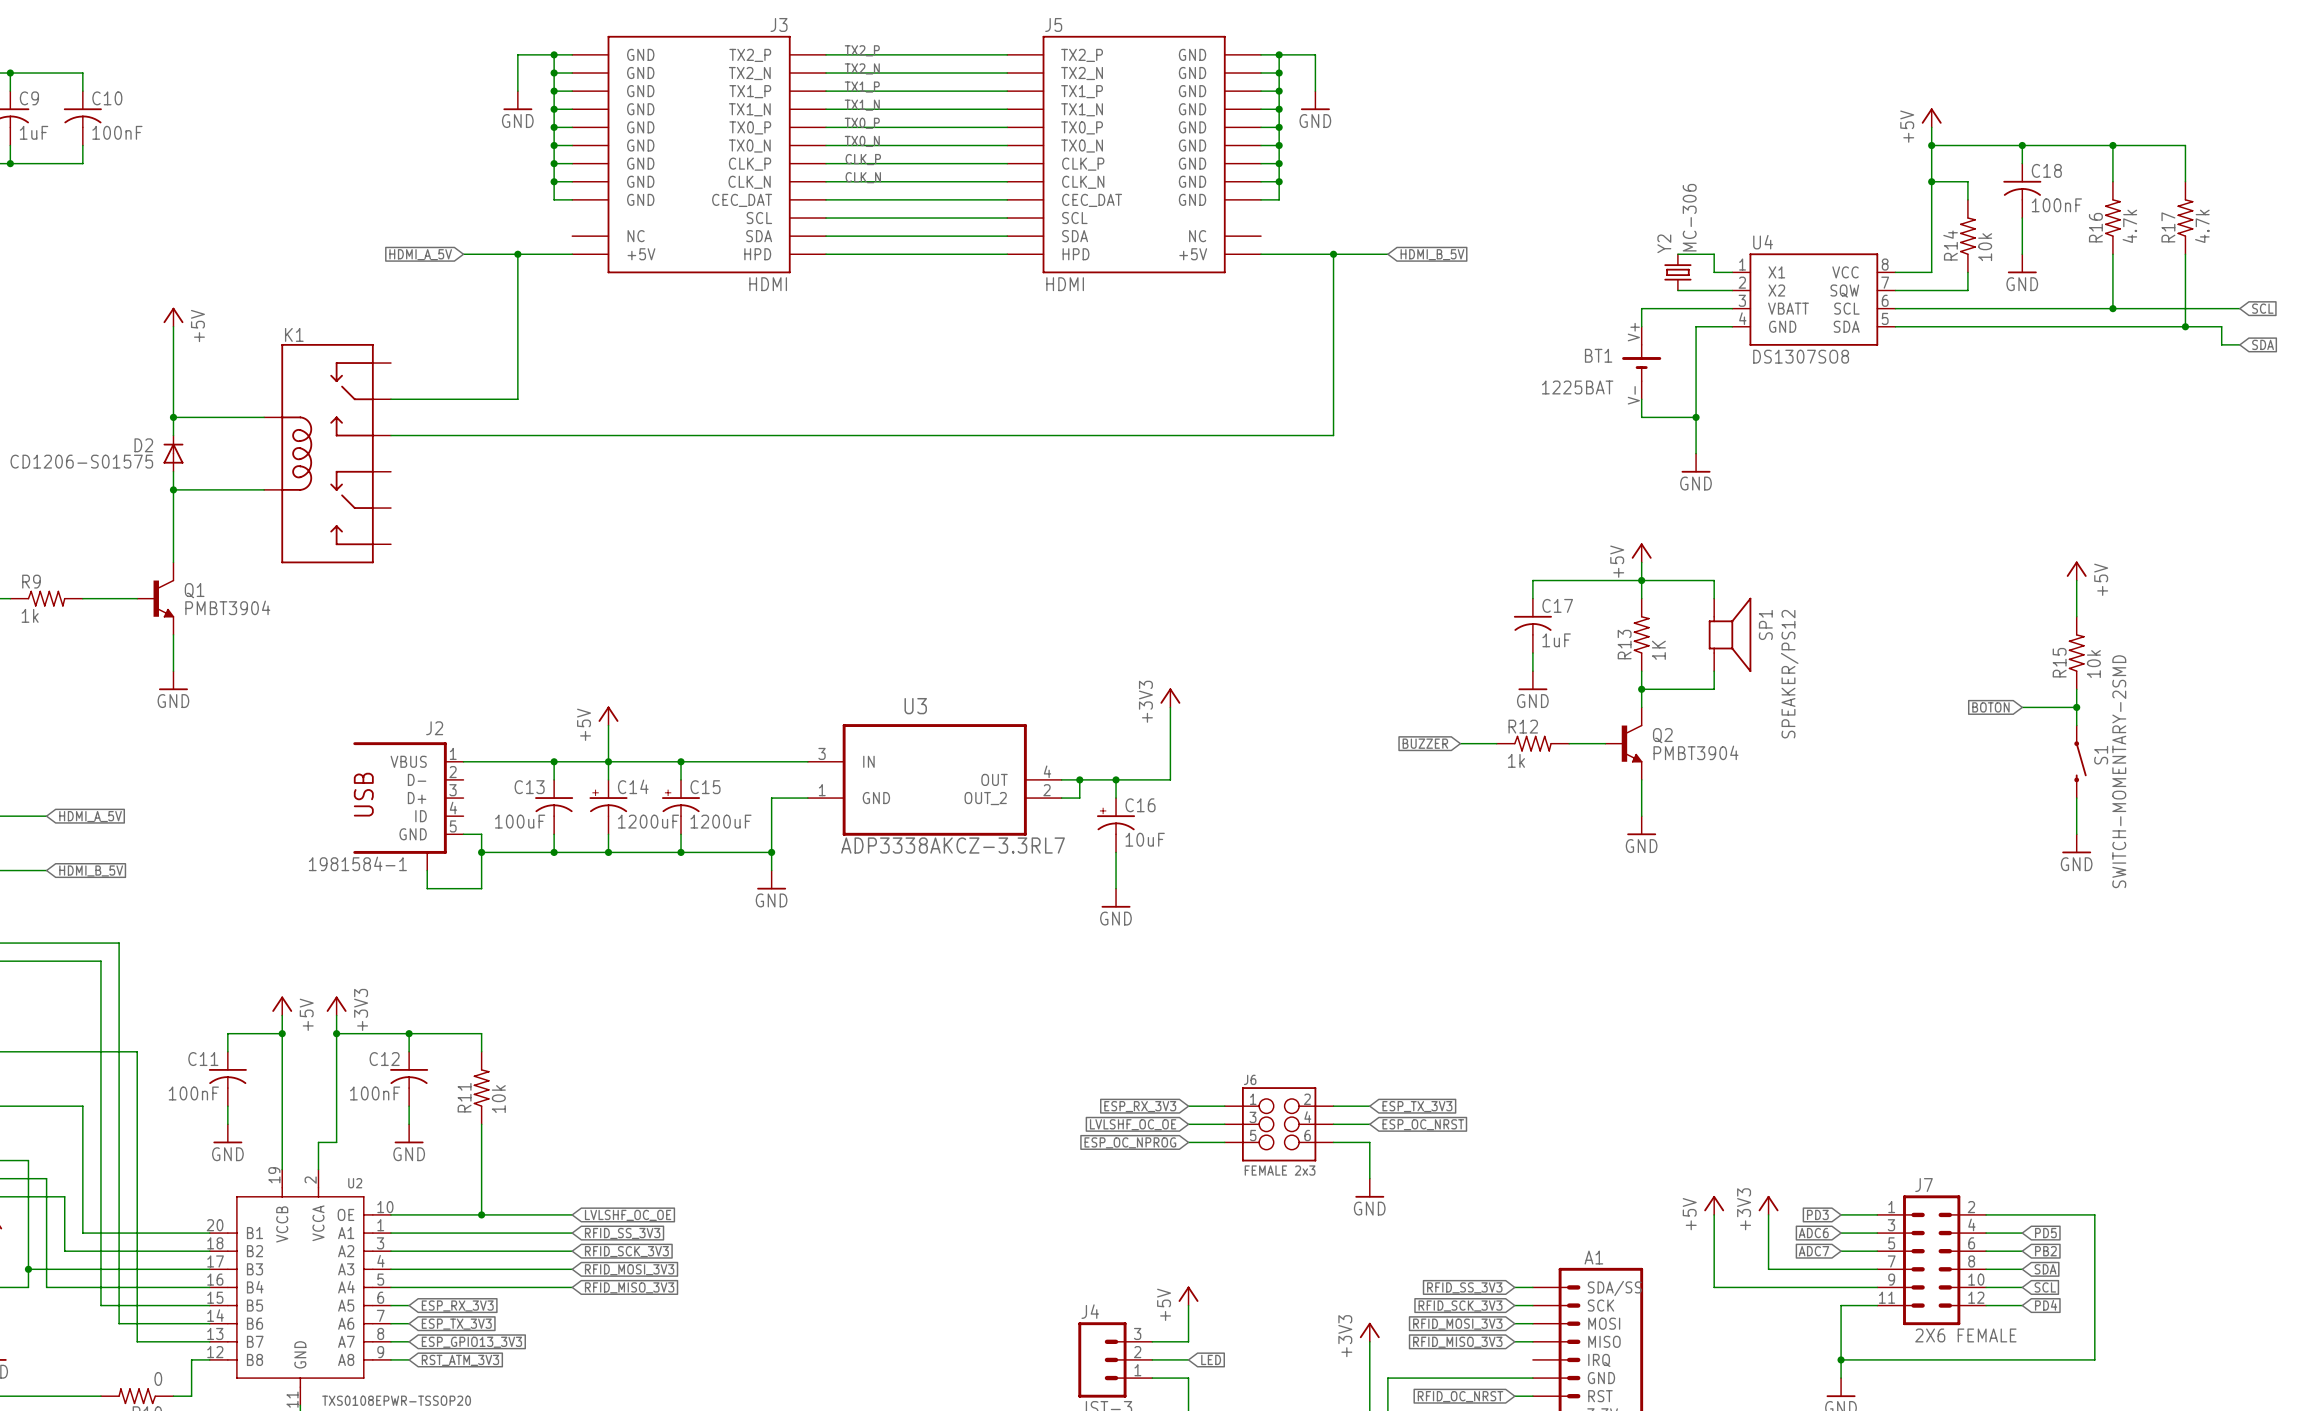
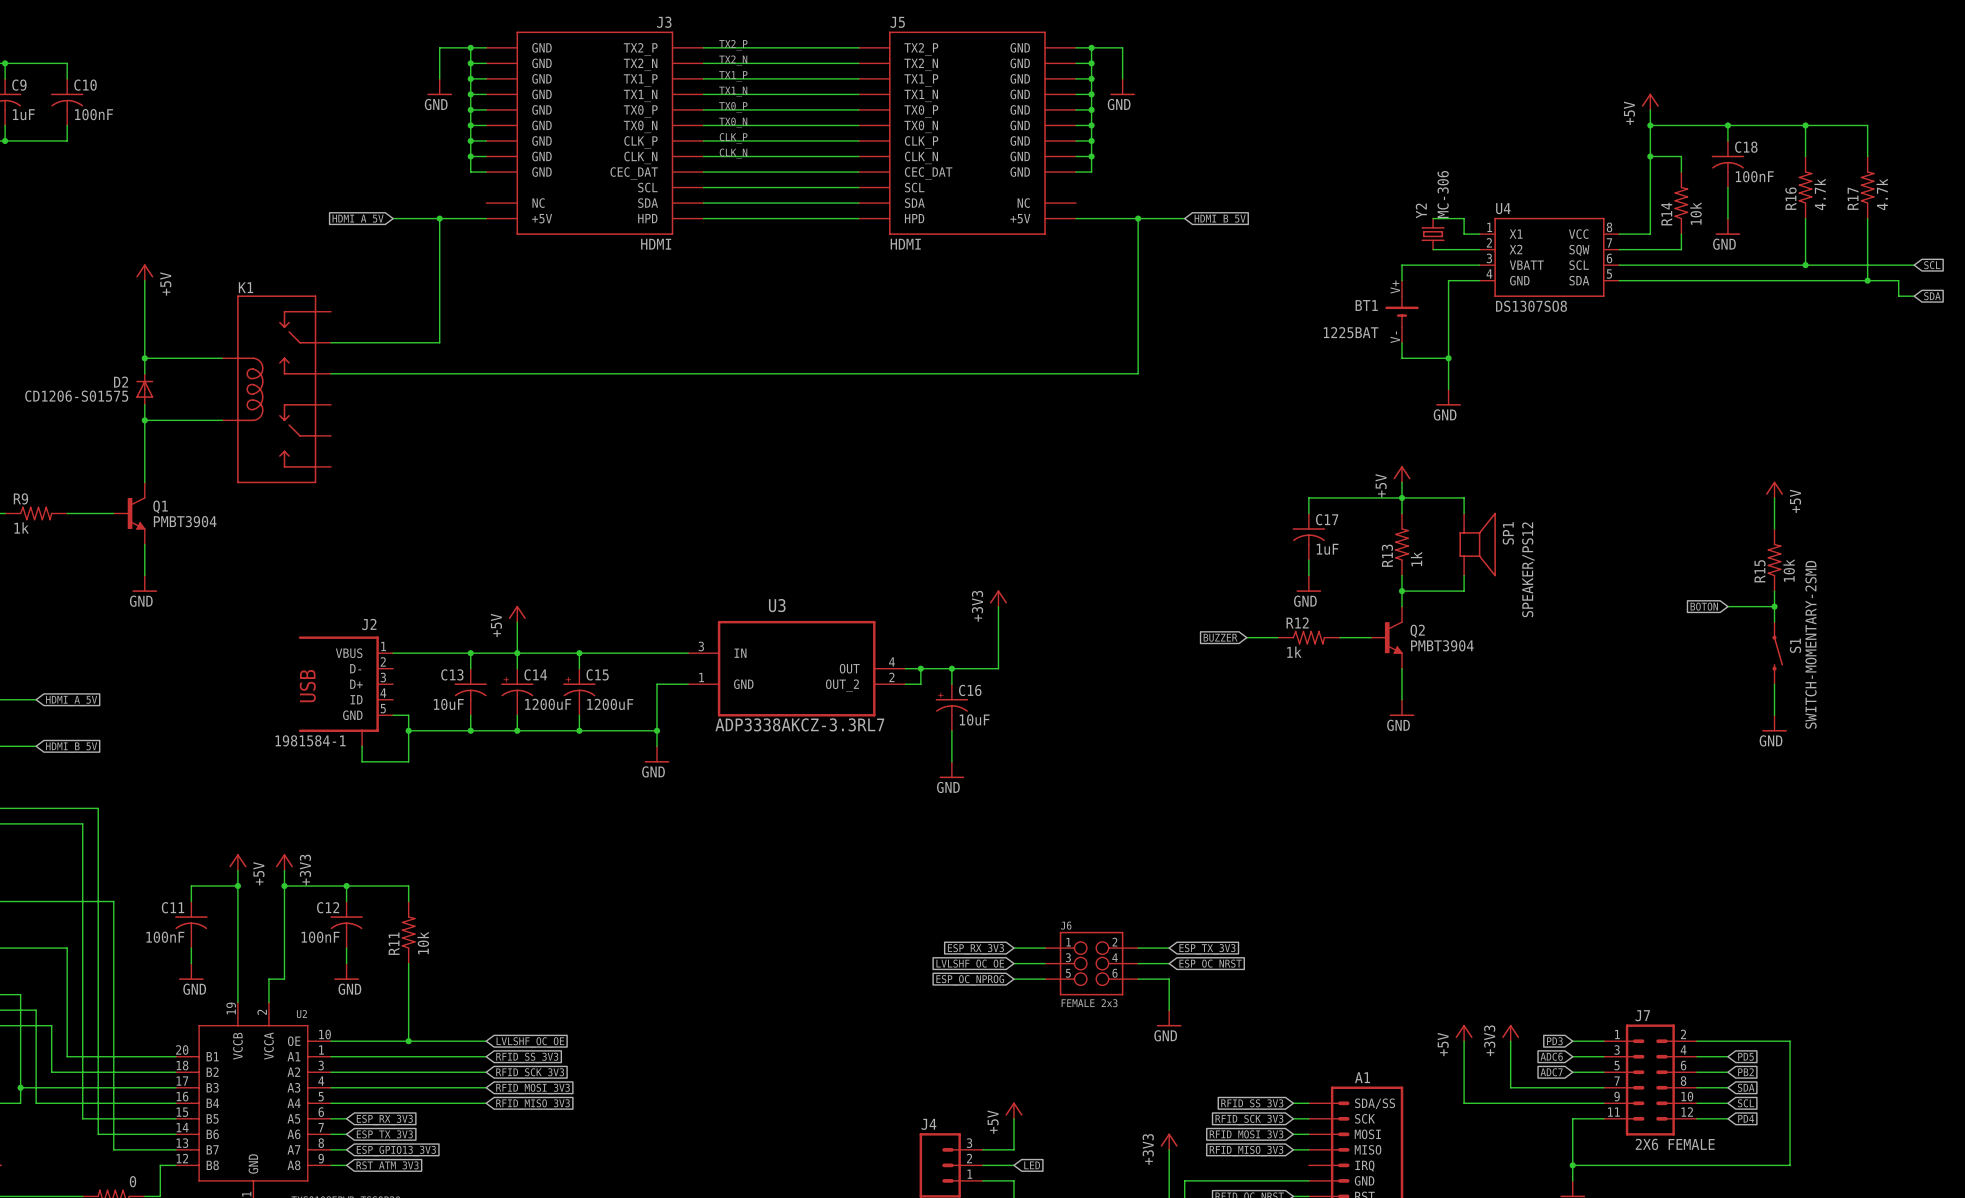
R13 value: 1K (1658, 650) -> 1k (1416, 559)
C13 value: 100uF (520, 821) -> 10uF (448, 704)

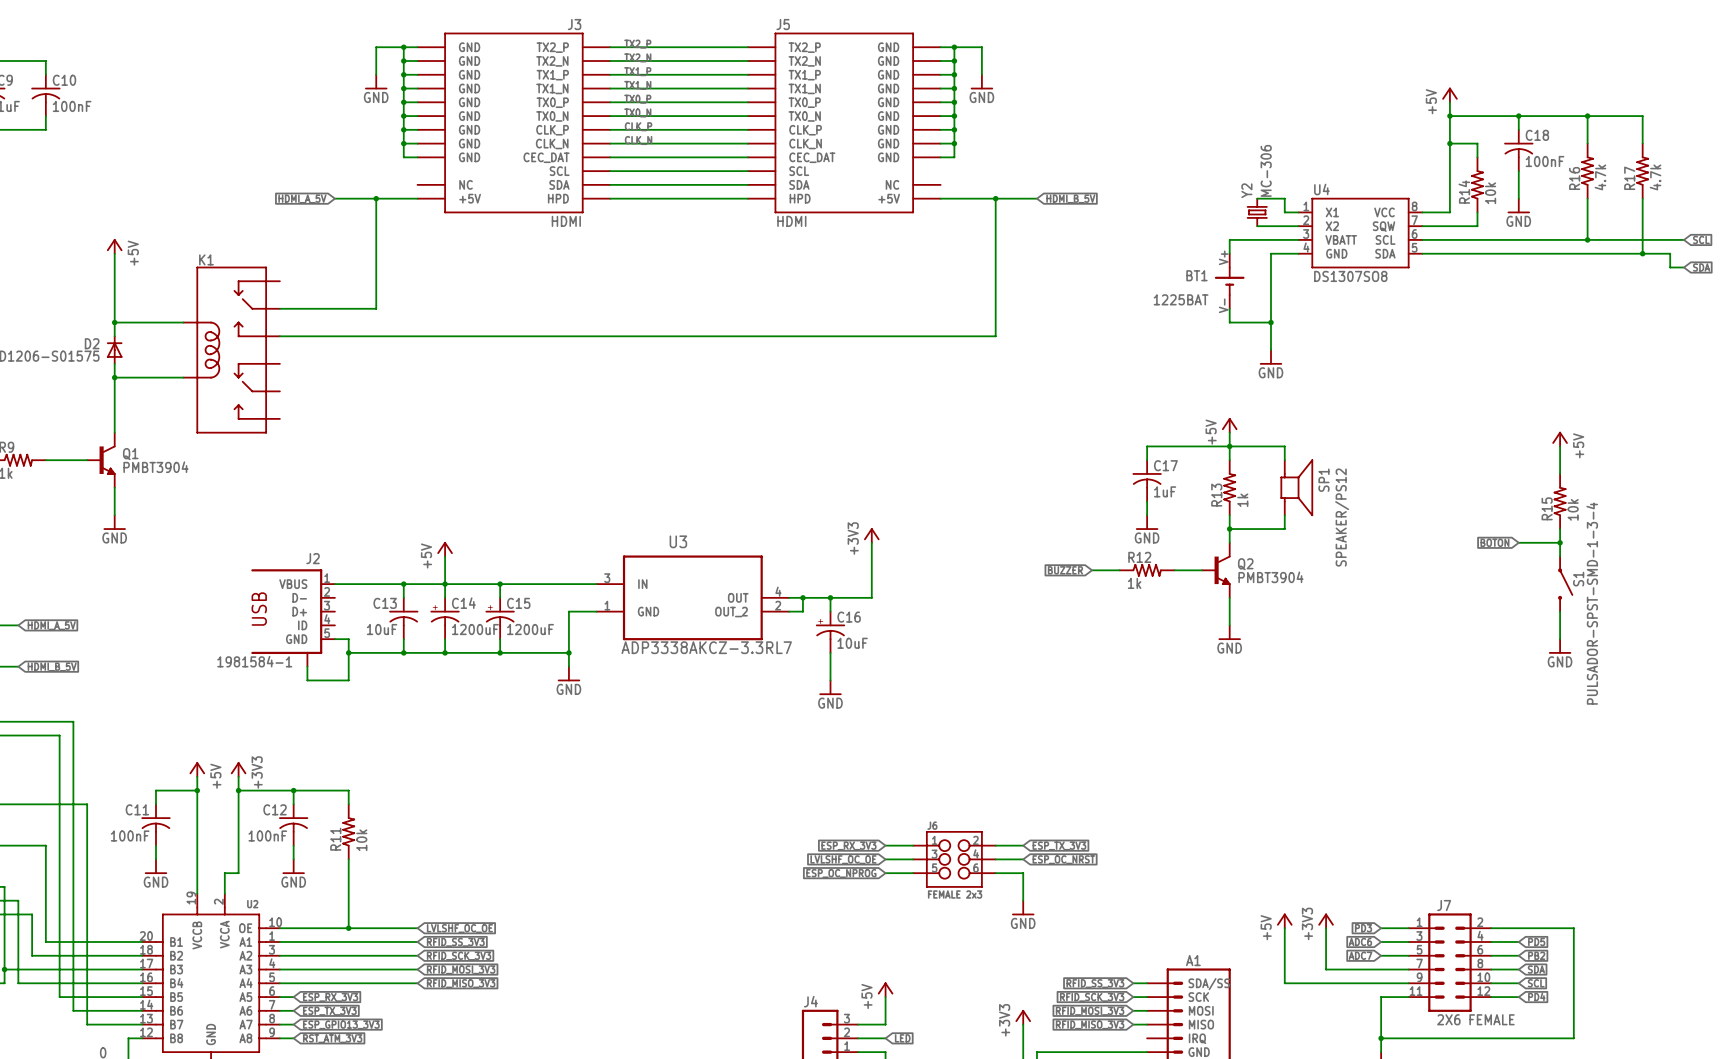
S1 symbol: [1772, 622, 1784, 685] -> [1558, 556, 1573, 612]
S1 value: SWITCH-MOMENTARY-2SMD (1810, 644) -> PULSADOR-SPST-SMD-1-3-4 (1592, 603)

